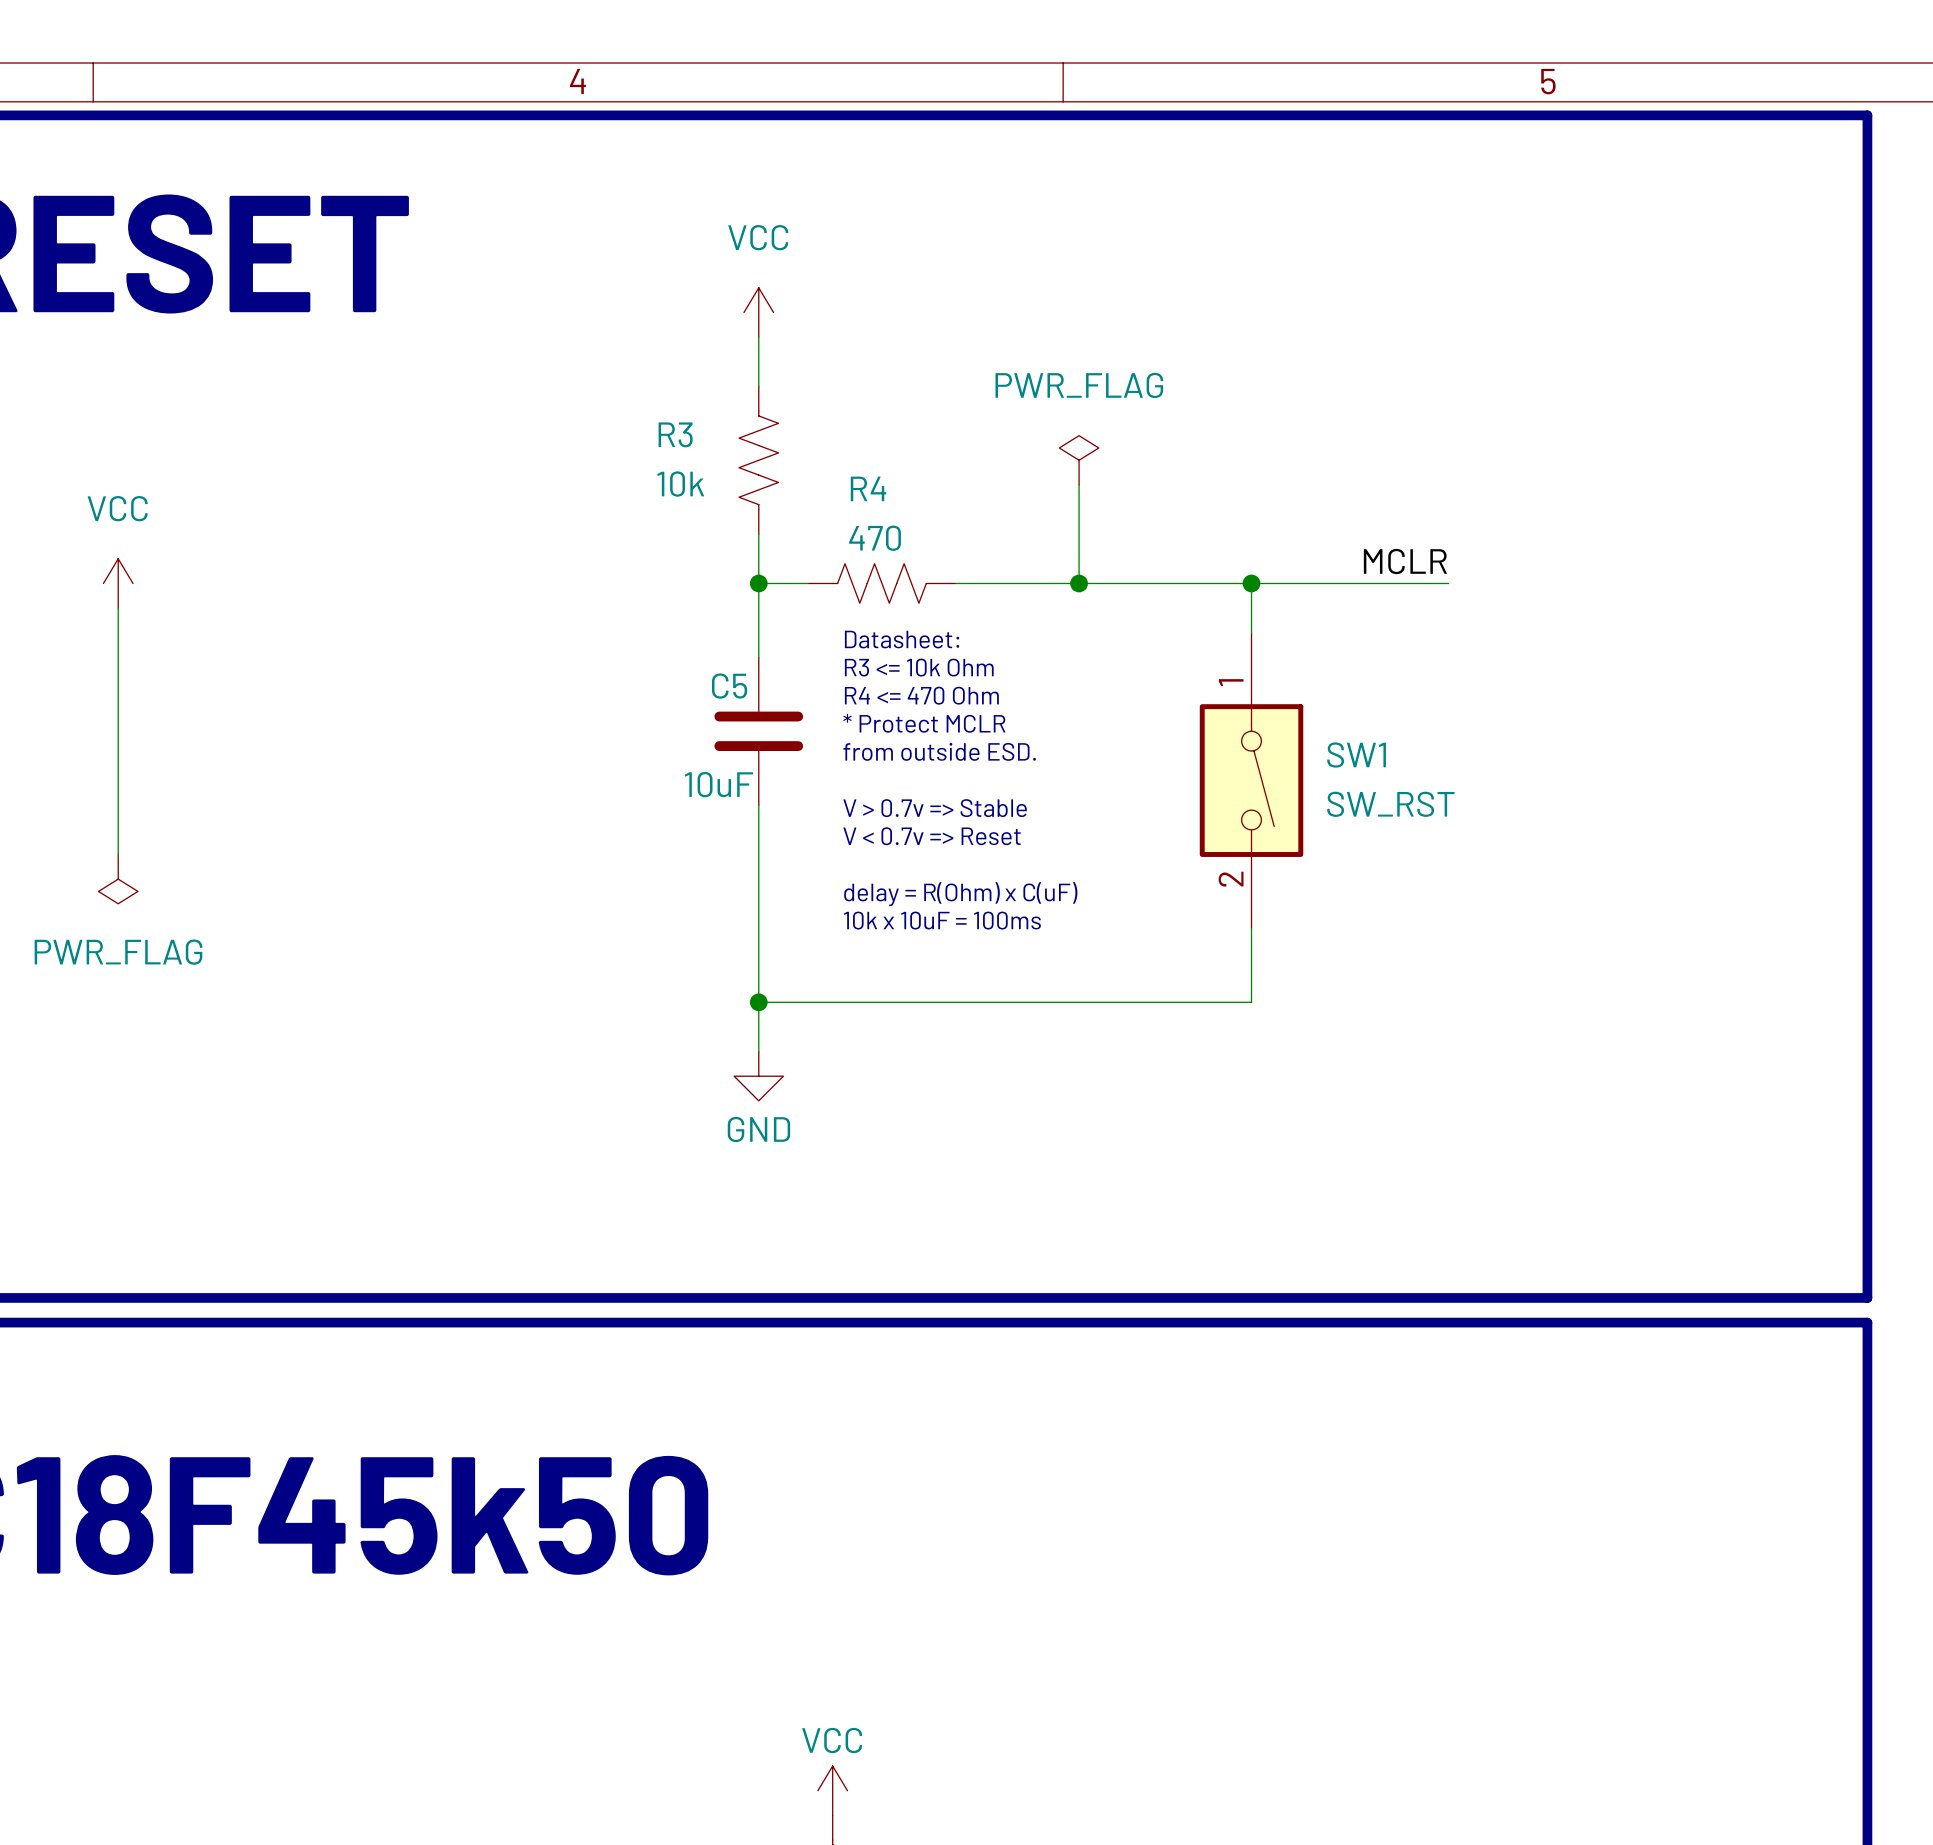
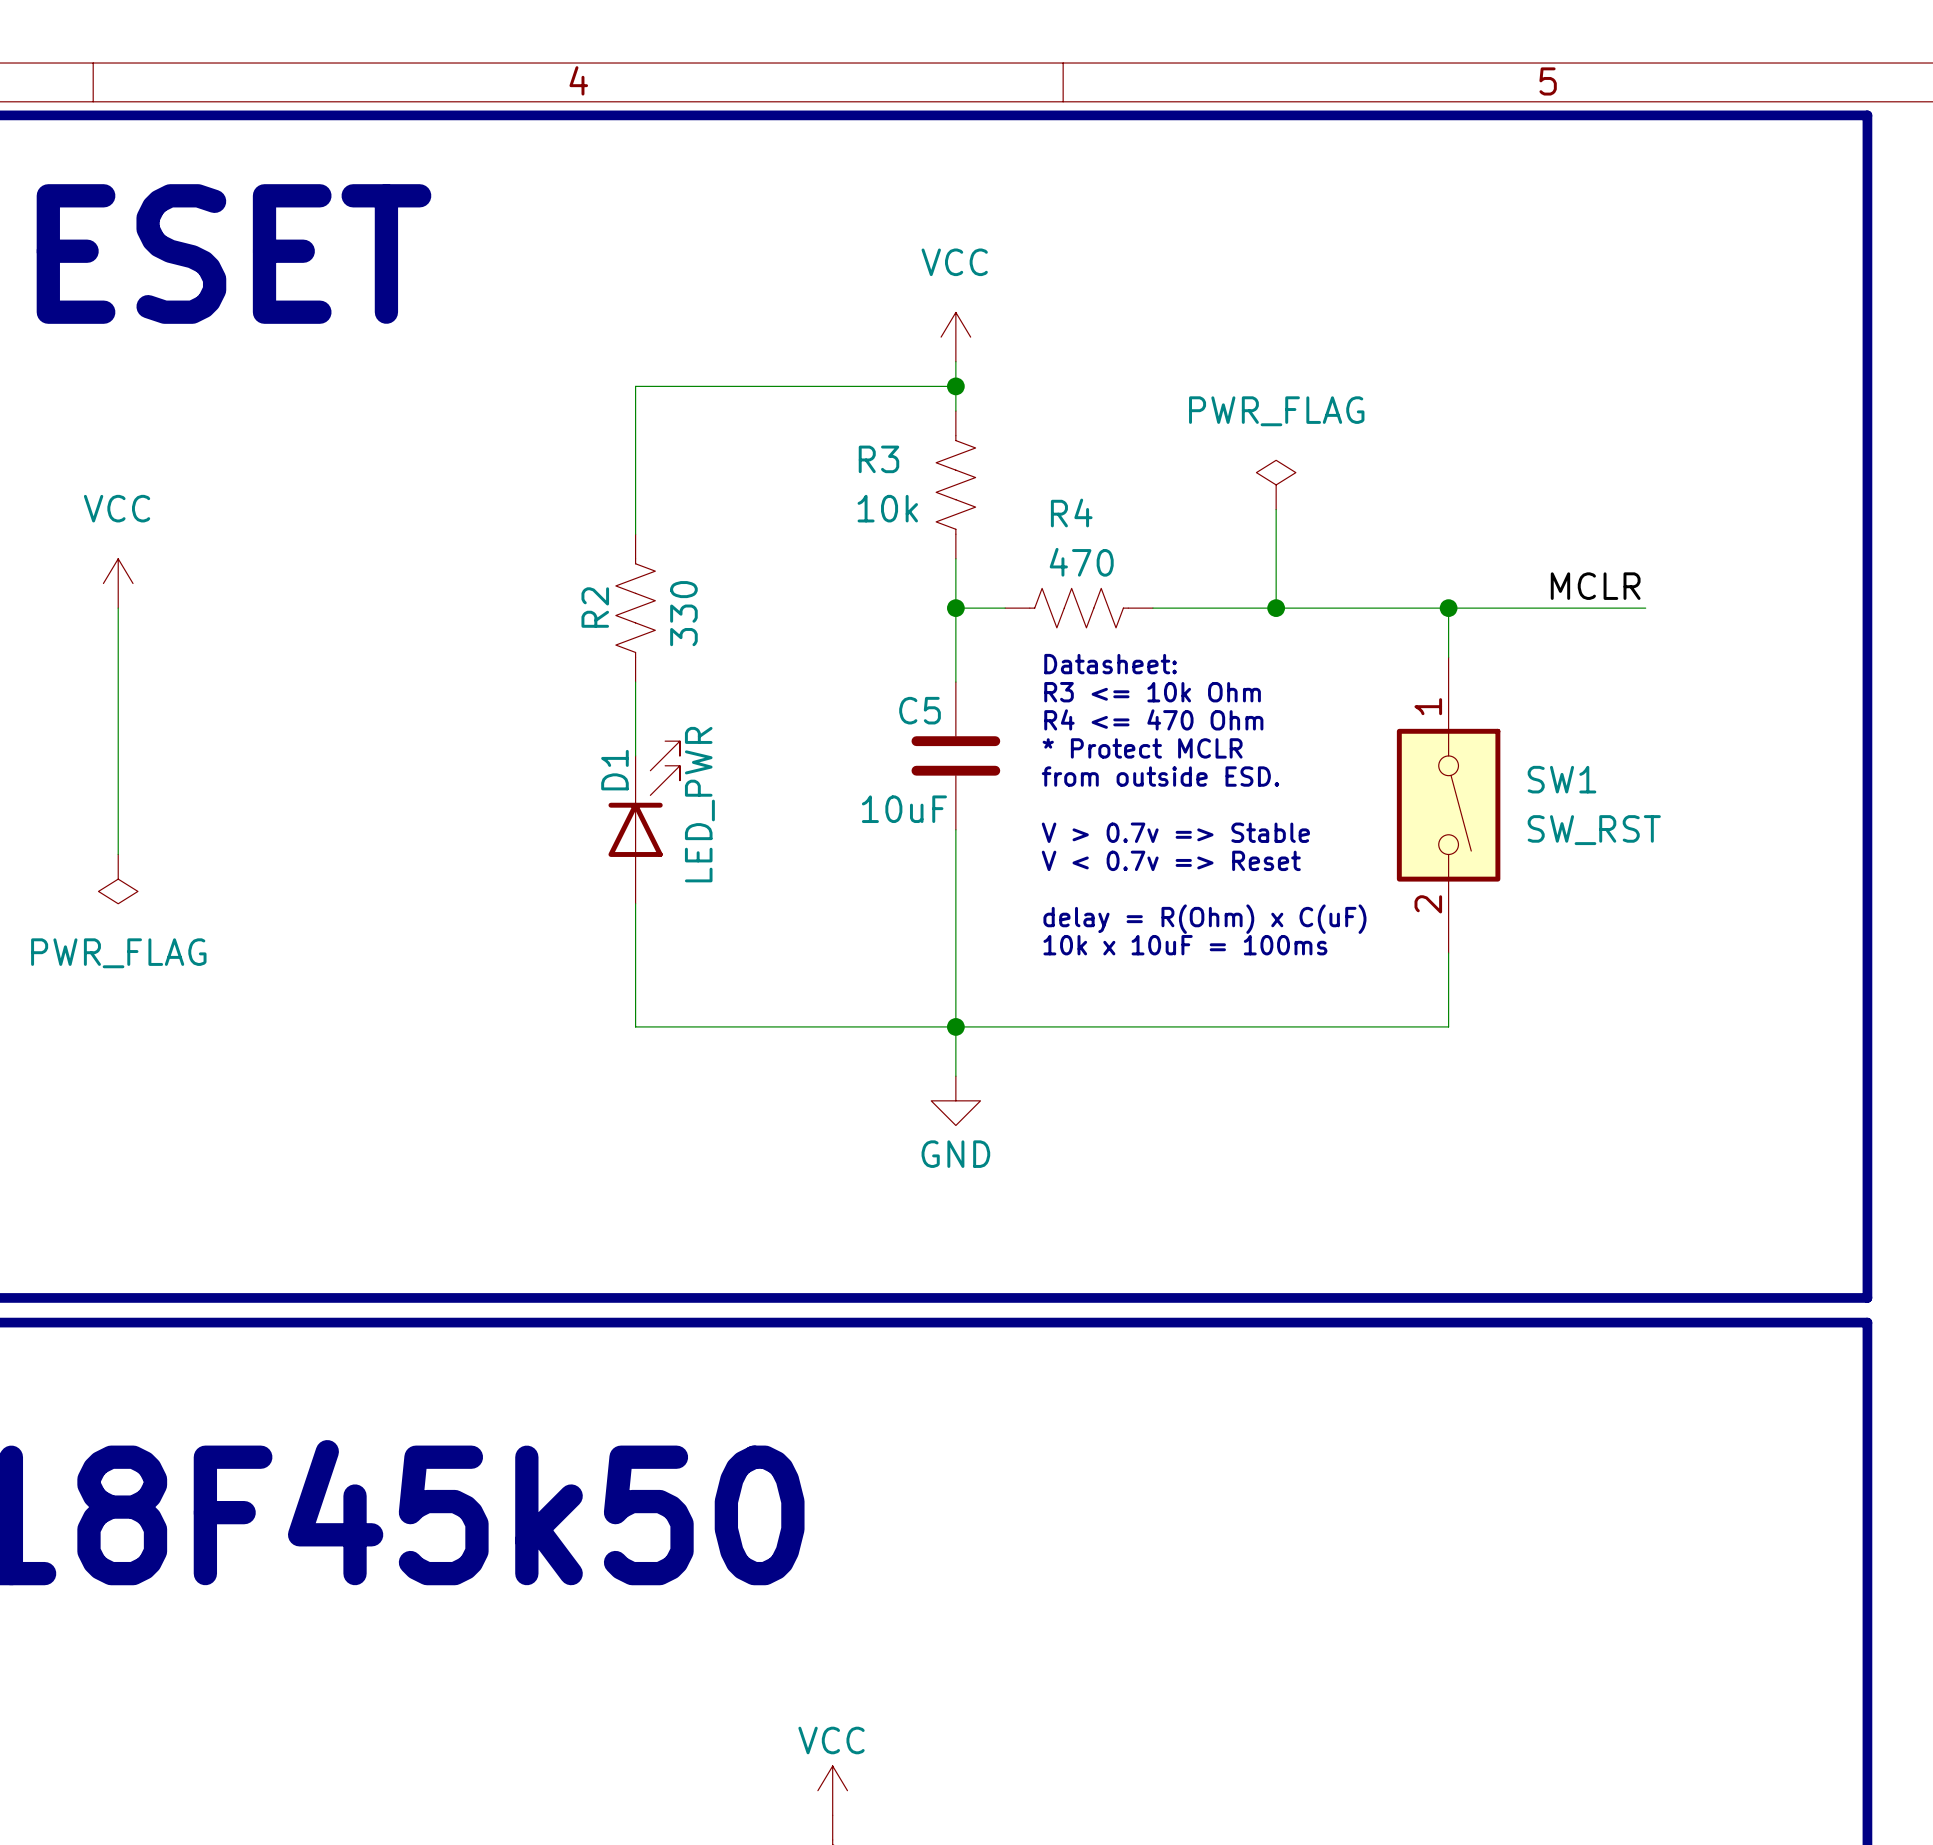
power symbol position: VCC (758, 312) -> VCC (955, 337)
wire: (758, 337) (758, 386) -> (955, 361) (955, 411)
wire: none -> (955, 386) (635, 386) (635, 534)
junction: none -> (955, 386)
R3 position: (758, 460) -> (955, 484)
power symbol position: PWR_FLAG (1079, 460) -> PWR_FLAG (1276, 484)
wire: (1079, 484) (1079, 583) -> (1276, 509) (1276, 608)
wire: (758, 534) (758, 657) -> (955, 558) (955, 682)
label position: MCLR (1405, 561) -> MCLR (1595, 586)
wire: (758, 583) (808, 583) -> (955, 608) (1005, 608)
junction: (758, 583) -> none
R4 position: (881, 583) -> (1079, 608)
wire: (955, 583) (1448, 583) -> (1152, 608) (1645, 608)
junction: (1079, 583) -> none
wire: (1251, 583) (1251, 632) -> (1448, 608) (1448, 657)
junction position: (1251, 583) -> (1276, 608)
R2: none -> 330 (635, 608)
junction: none -> (955, 608)
junction: none -> (1448, 608)
text position: Datasheet: (902, 639) -> Datasheet: (1110, 664)
text position: R3 <= 10k Ohm (919, 667) -> R3 <= 10k Ohm (1152, 692)
wire: none -> (635, 682) (635, 755)
text position: R4 <= 470 Ohm (921, 695) -> R4 <= 470 Ohm (1153, 719)
text position: * Protect MCLR (924, 723) -> * Protect MCLR (1142, 748)
C5 position: (758, 731) -> (955, 755)
text position: from outside ESD. (939, 751) -> from outside ESD. (1160, 776)
SW1 position: (1251, 780) -> (1448, 805)
wire: (758, 805) (758, 1051) -> (955, 829) (955, 1076)
text position: V > 0.7v => Stable (935, 808) -> V > 0.7v => Stable (1175, 832)
D1: none -> LED_PWR (644, 822)
text position: V < 0.7v => Reset (932, 836) -> V < 0.7v => Reset (1171, 860)
text position: delay = R(Ohm) x C(uF) (960, 894) -> delay = R(Ohm) x C(uF) (1204, 919)
wire: none -> (635, 903) (635, 1026) (1448, 1026) (1448, 953)
text position: 10k x 10uF = 100ms (942, 920) -> 10k x 10uF = 100ms (1185, 945)
wire: (1251, 928) (1251, 1002) (758, 1002) -> none
junction: (758, 1002) -> none
junction: none -> (955, 1026)
power symbol position: GND (758, 1076) -> GND (955, 1100)

